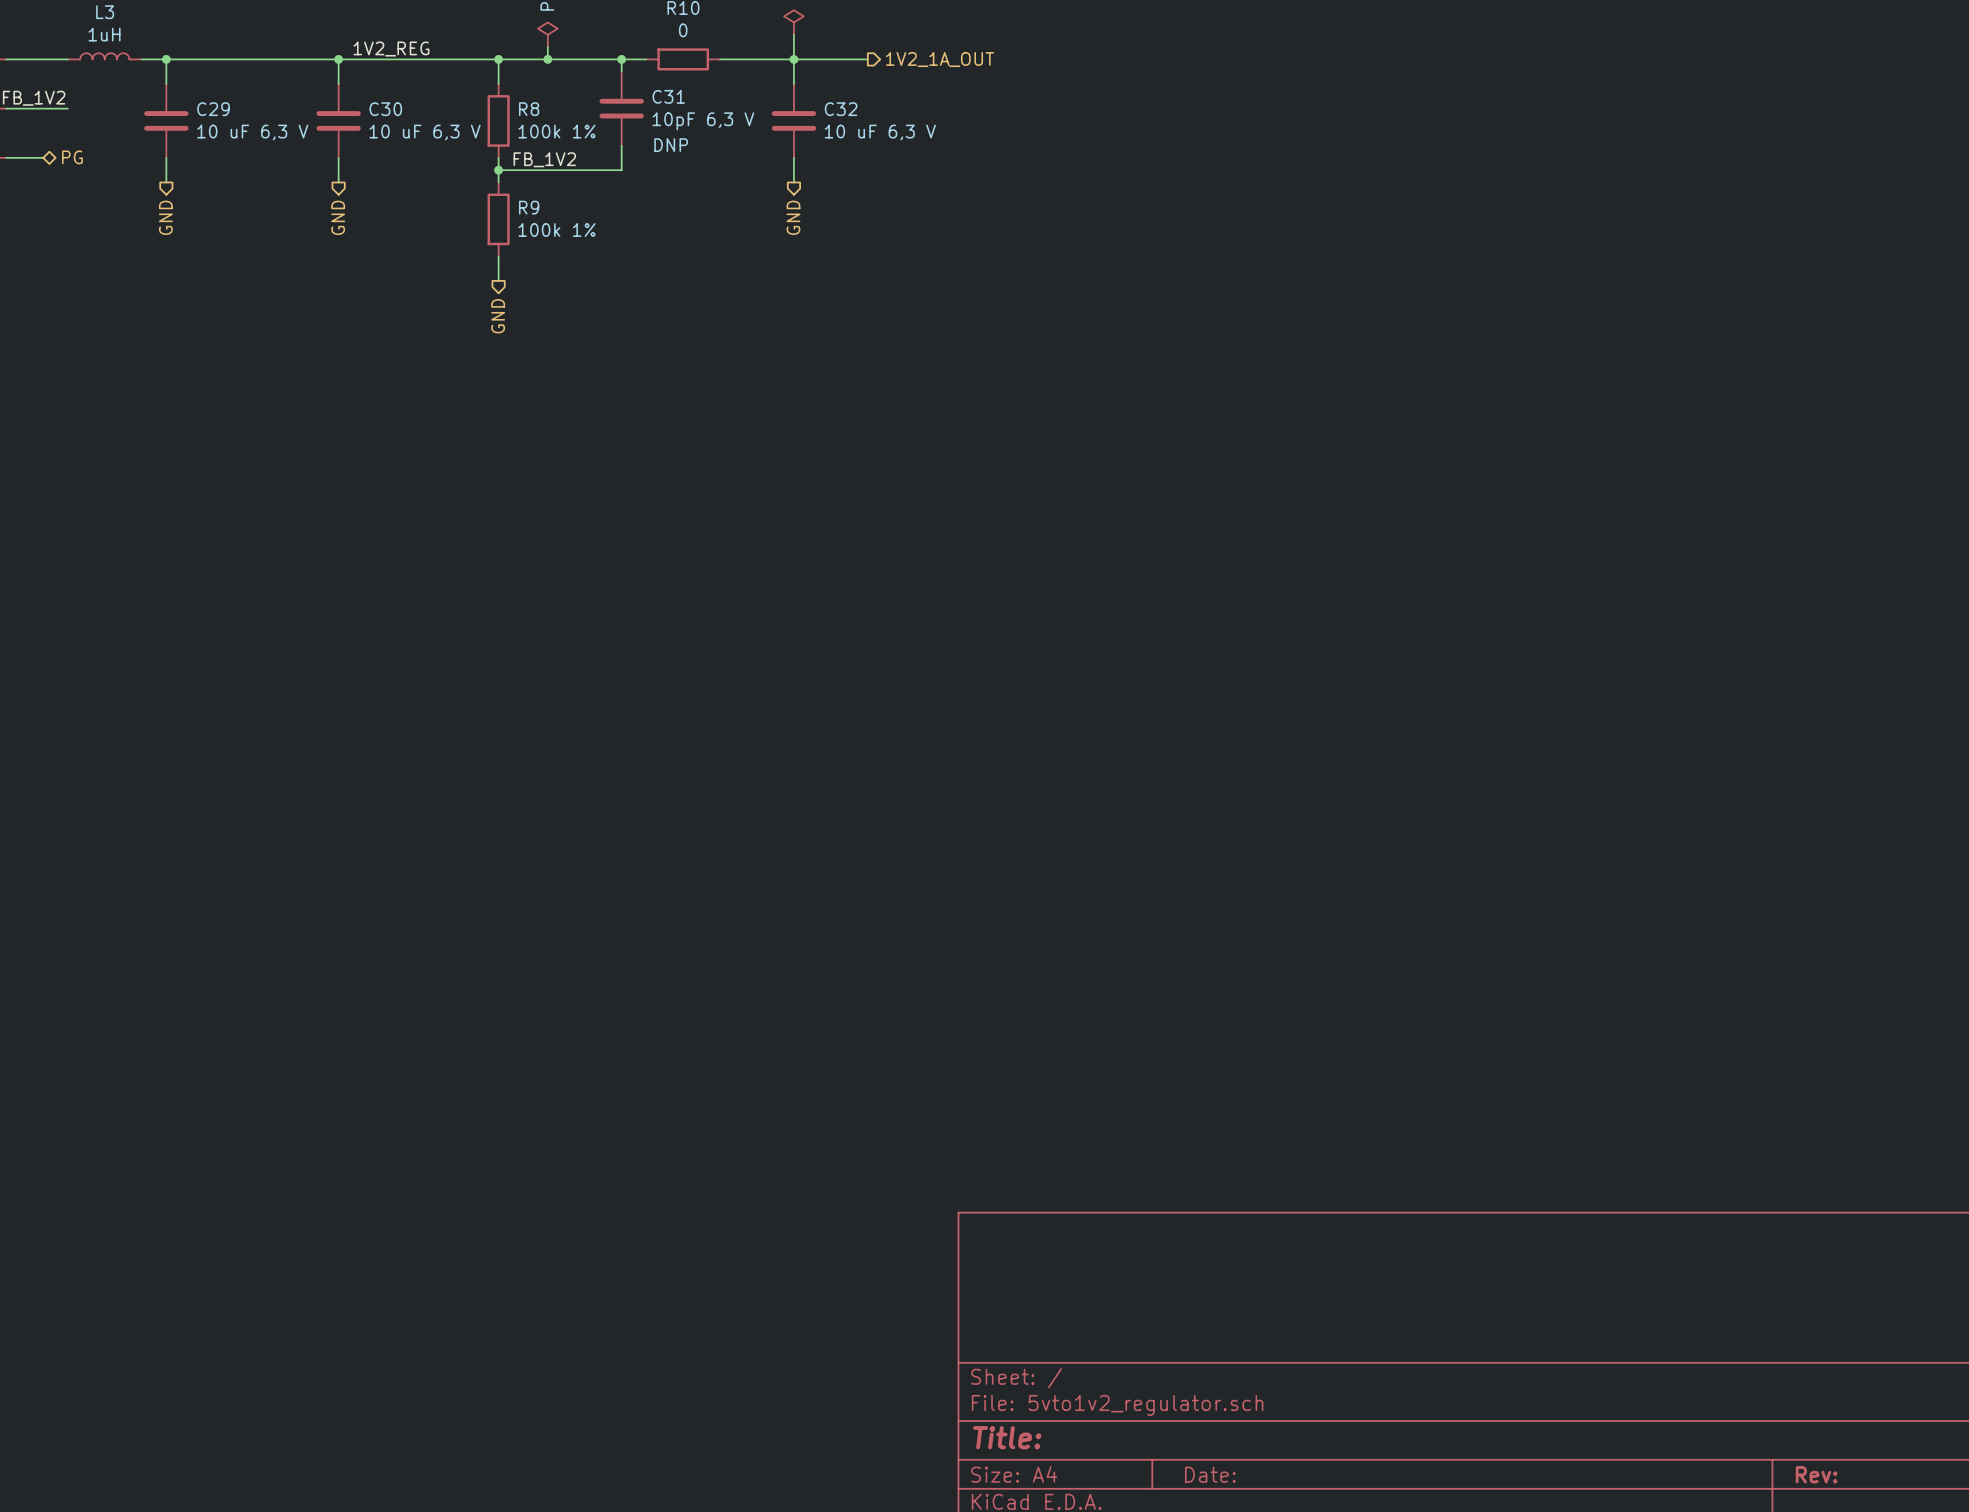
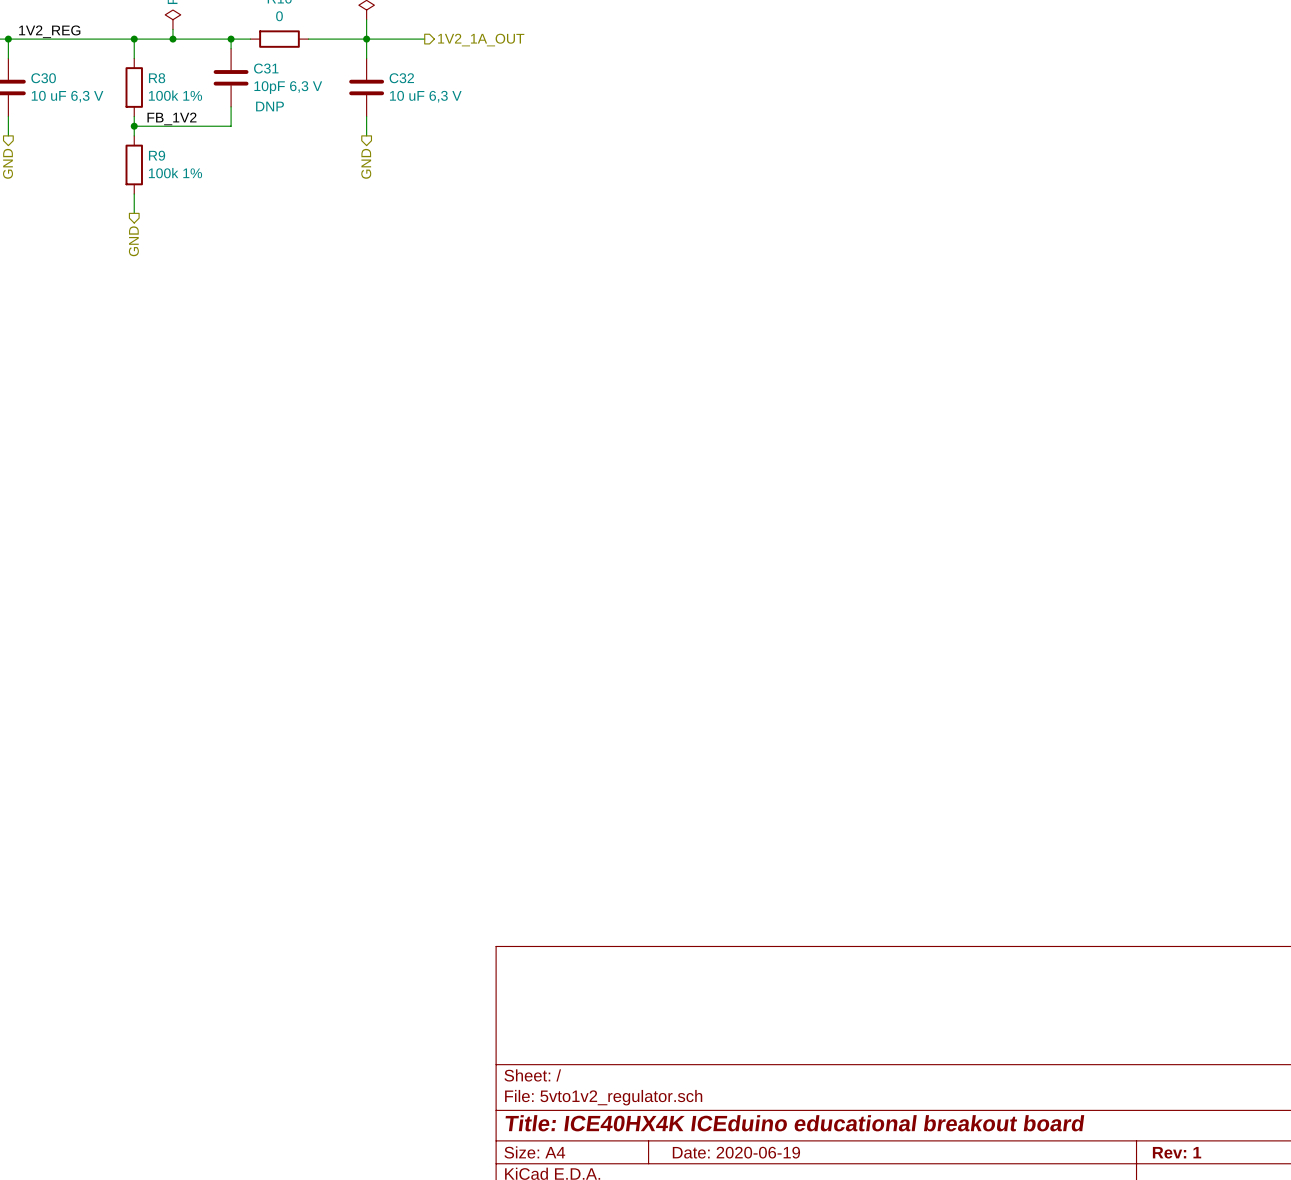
title block: Title: (1007, 1437) -> Title: ICE40HX4K ICEduino educational breakout board (794, 1123)
title block: Date: (1210, 1474) -> Date: 2020-06-19 (736, 1152)
title block: Rev: (1816, 1474) -> Rev: 1 (1177, 1152)

